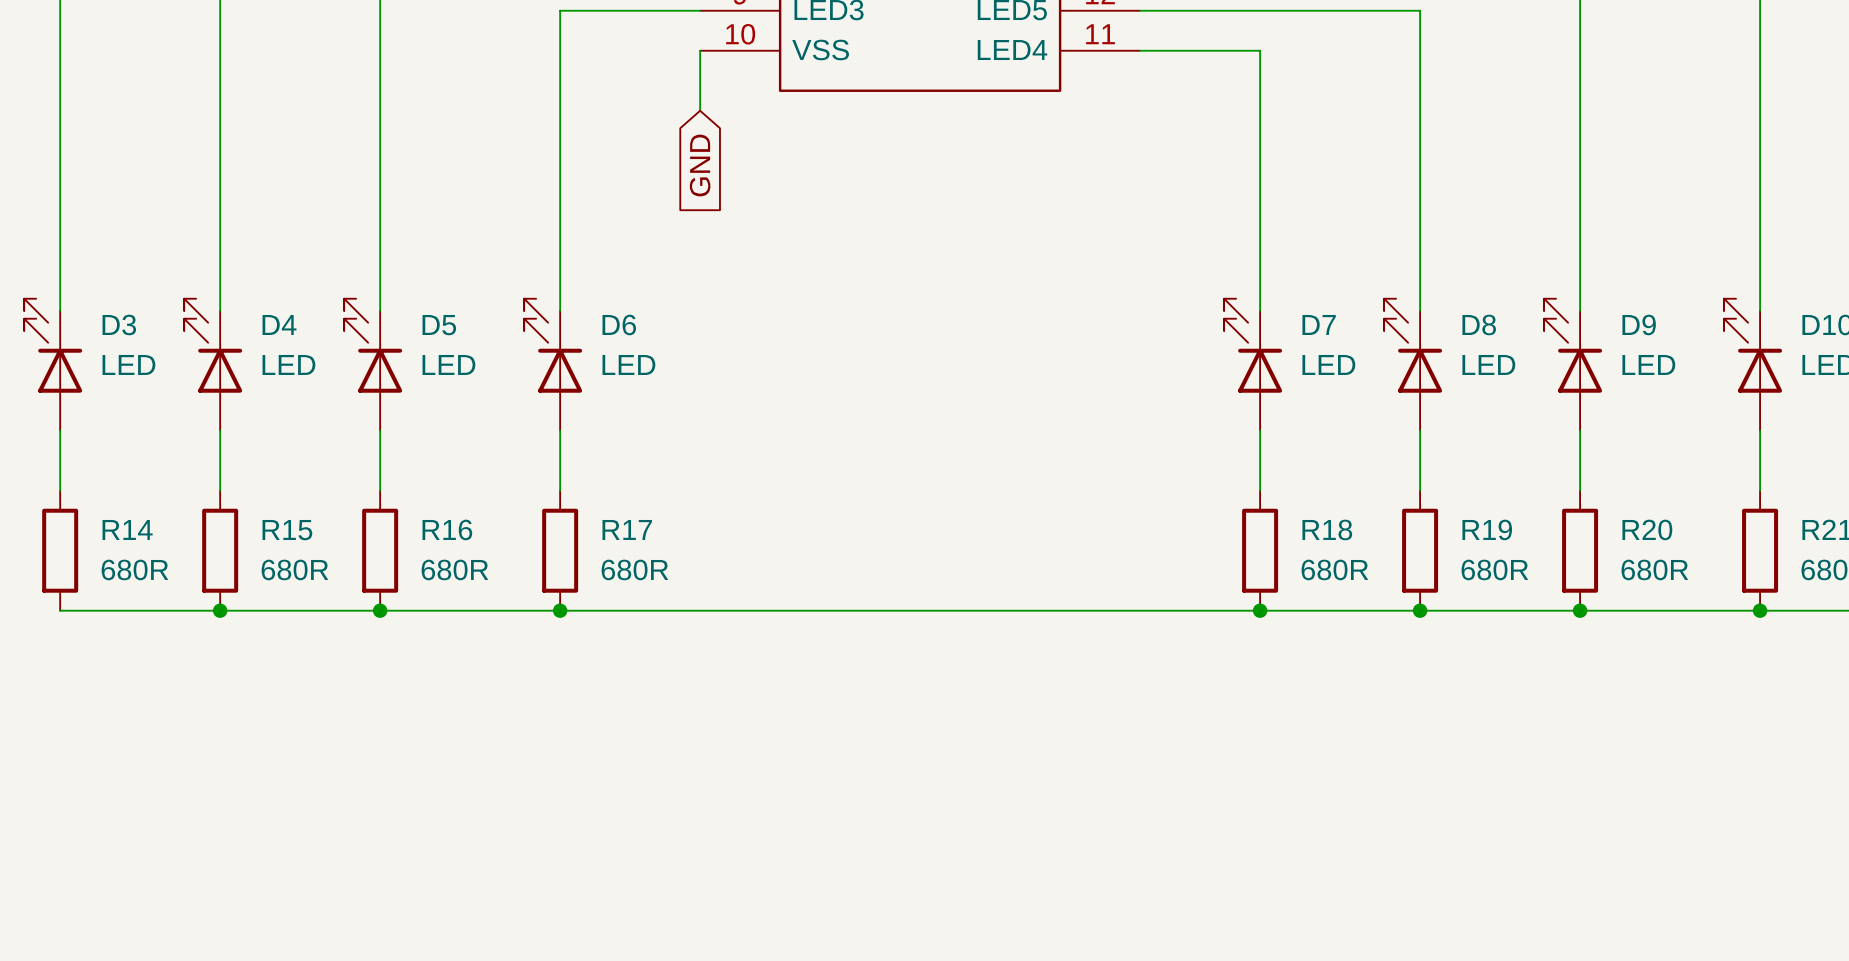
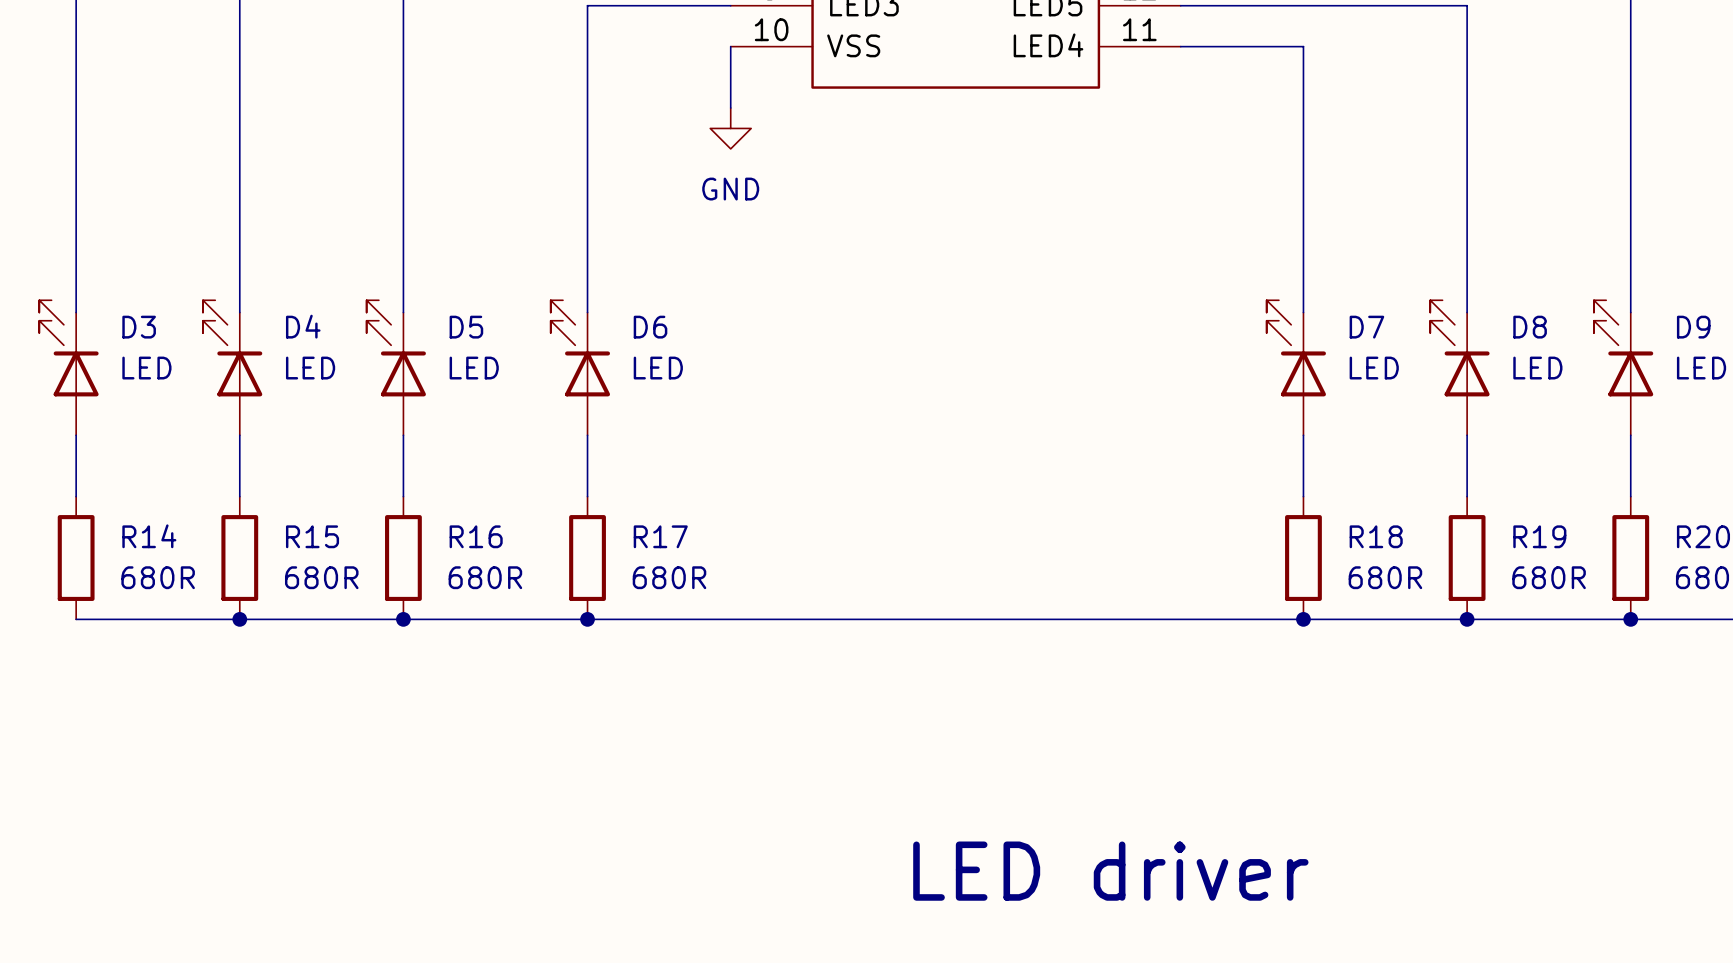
power symbol: none -> GND (730, 128)
global label: GND (700, 165) -> none
text: none -> LED driver (1110, 871)

